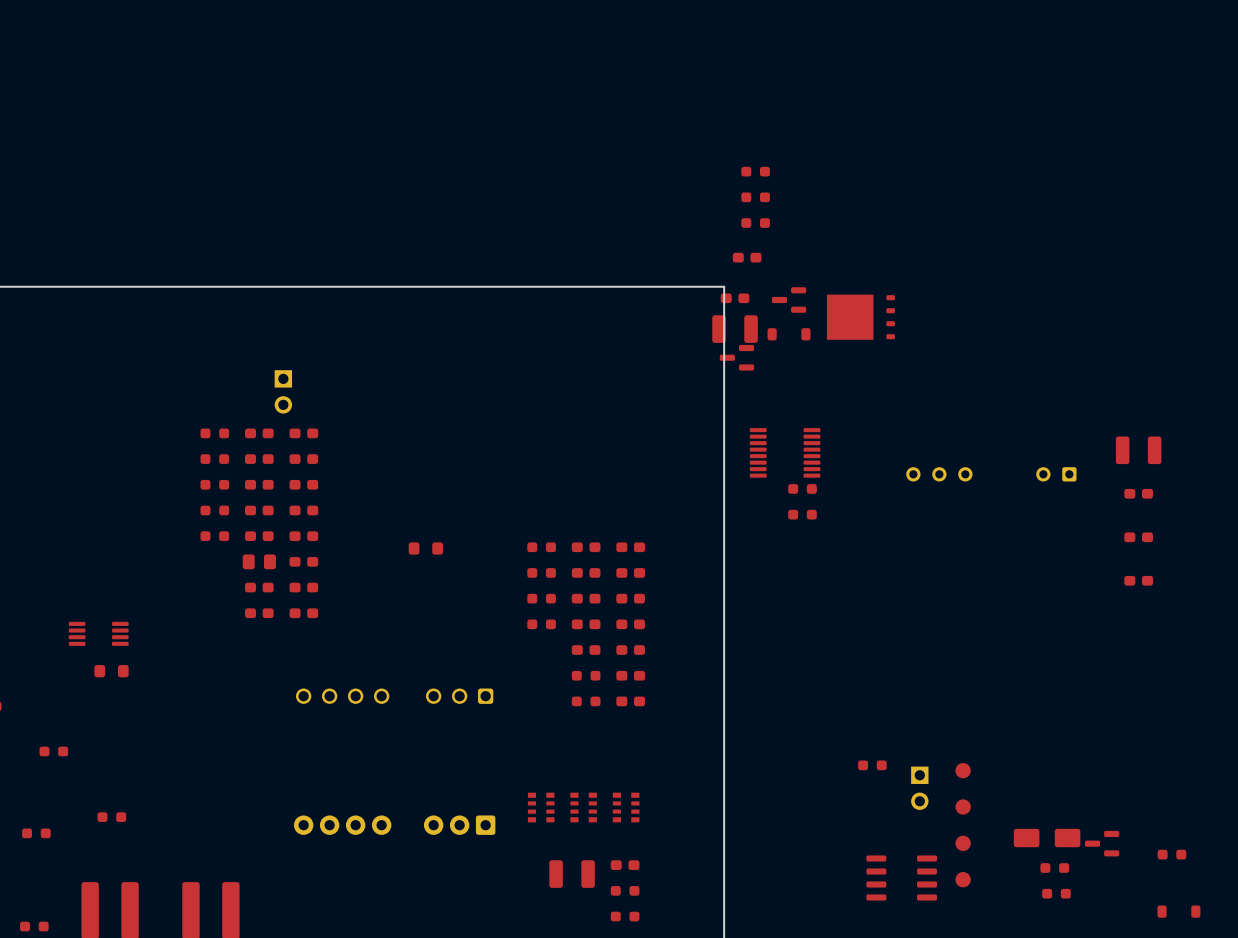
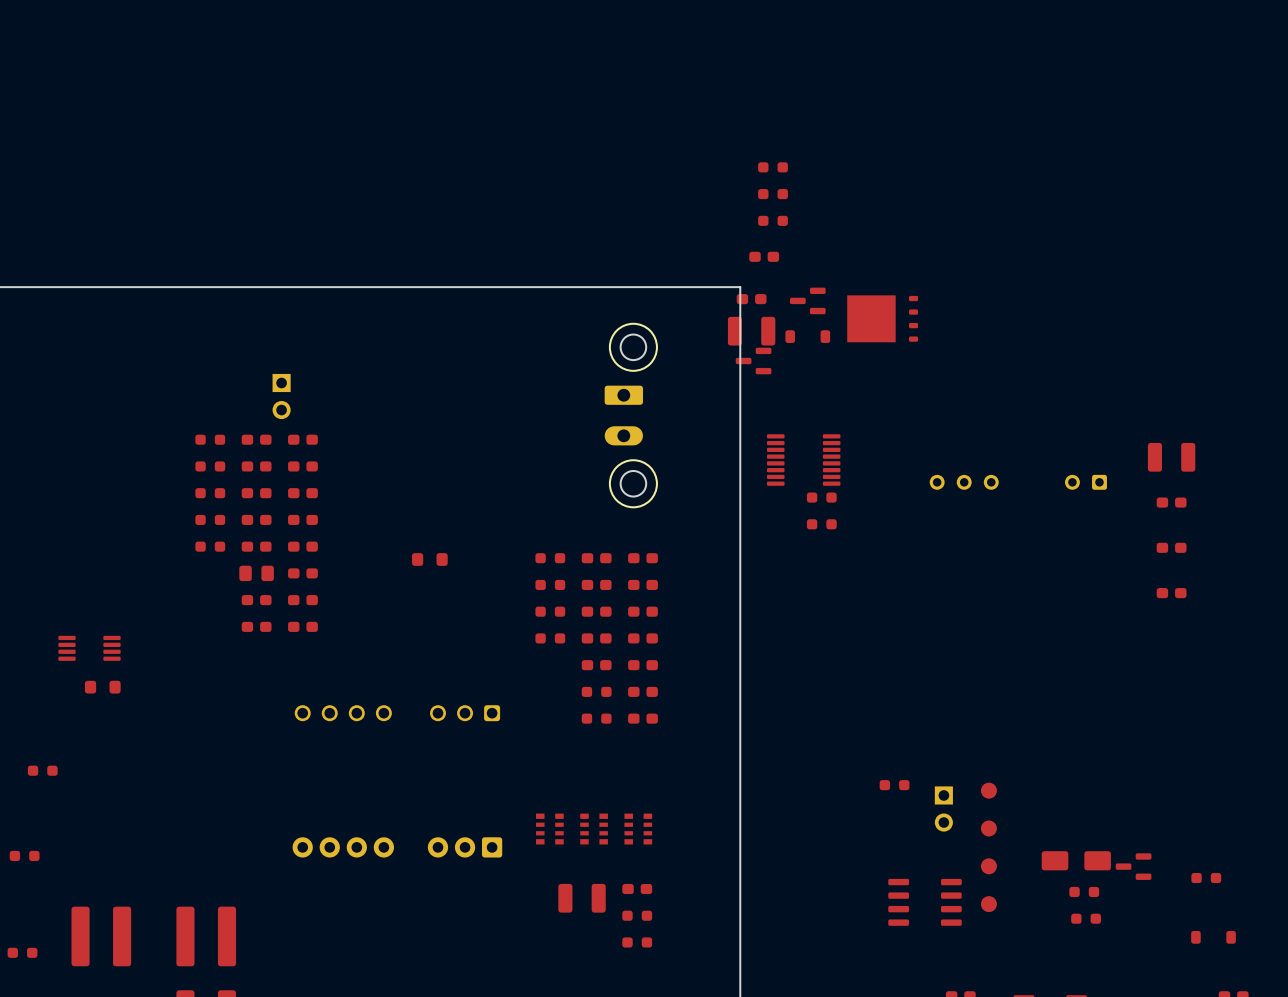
part: none -> (631, 415)
part: (111, 817) -> none

